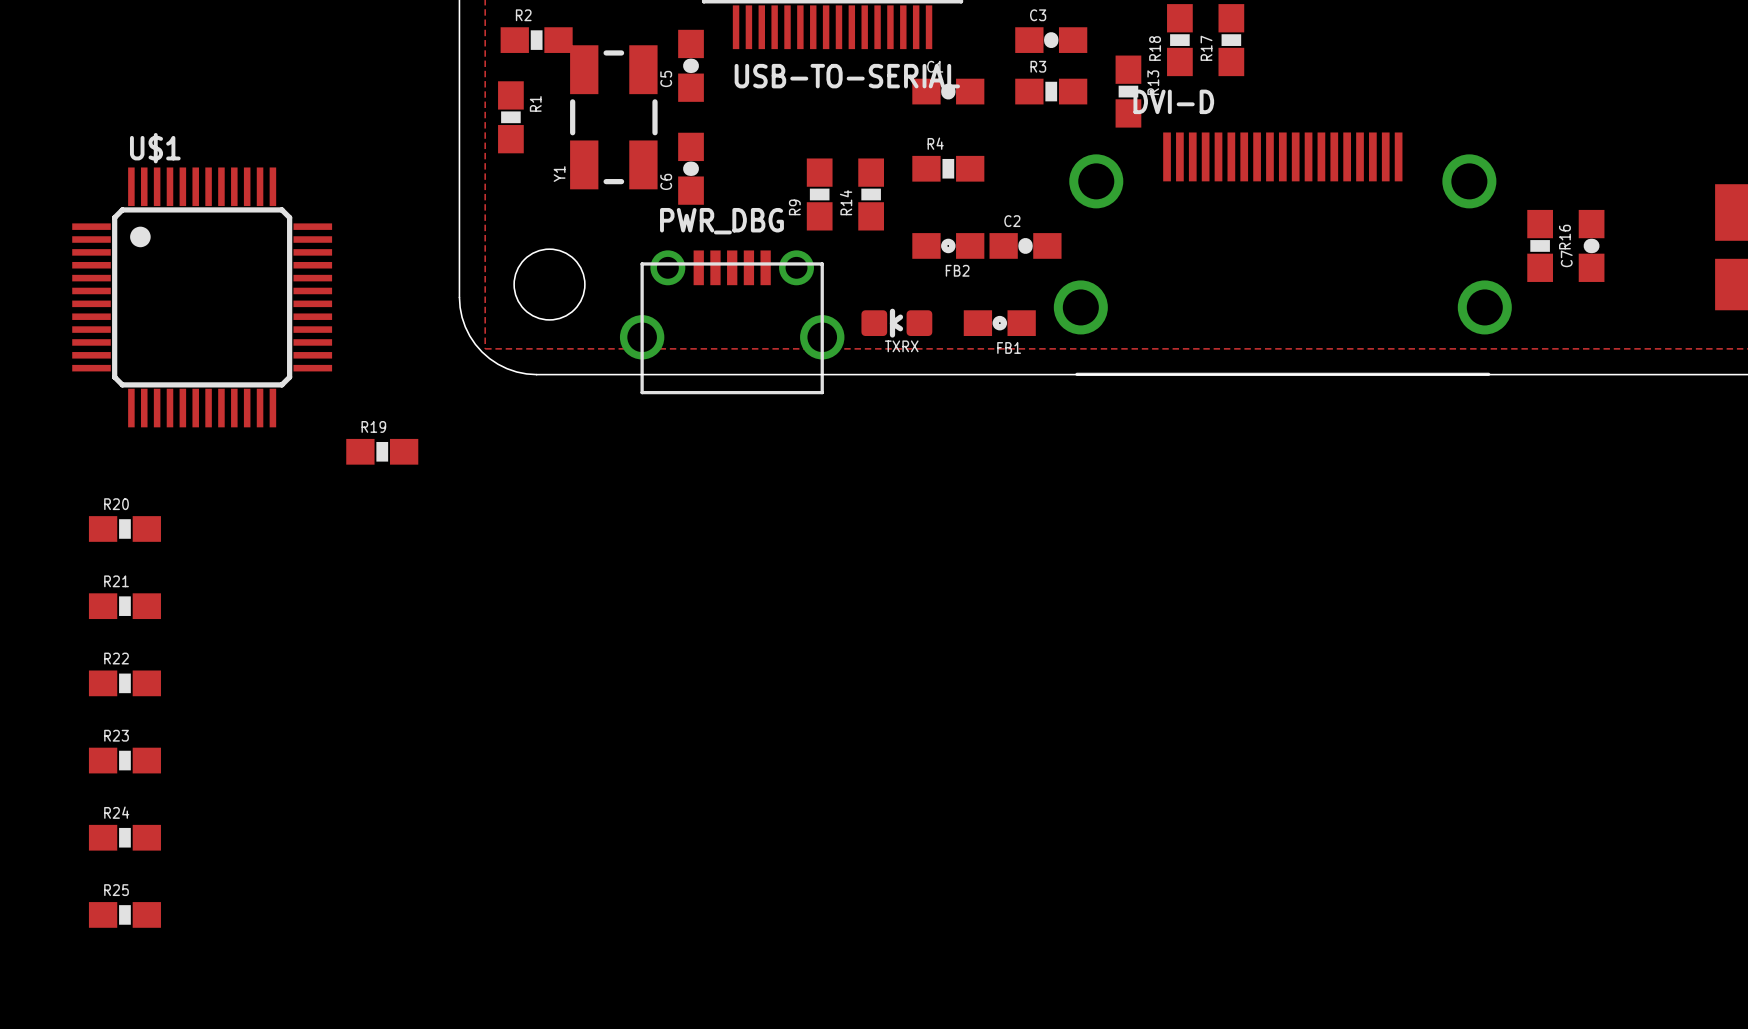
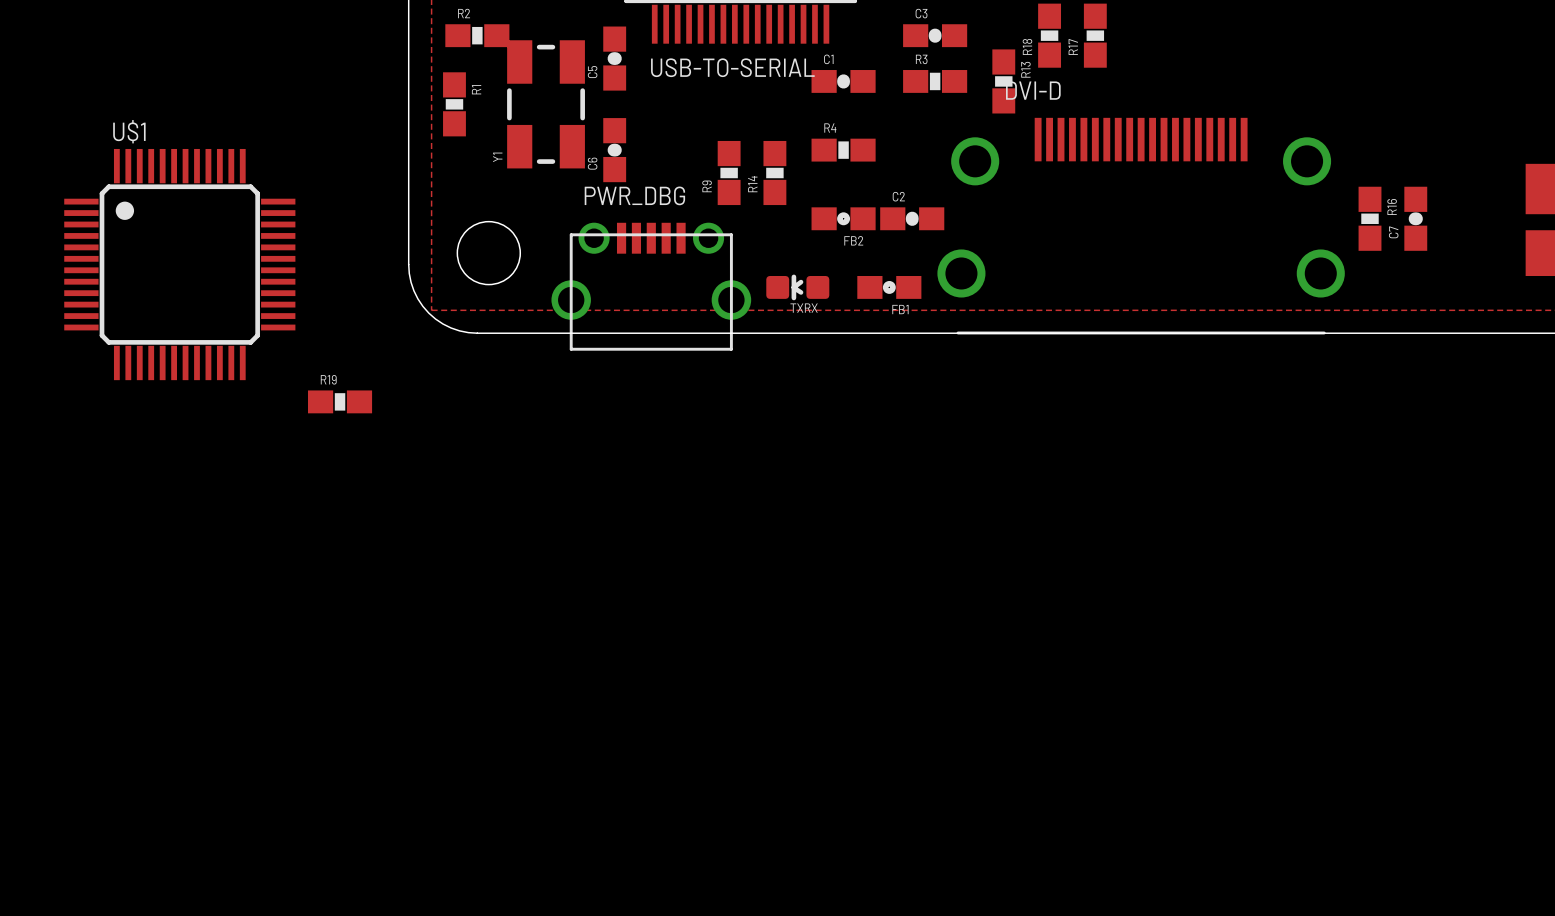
R20: (124, 528) -> none
R21: (124, 606) -> none
R22: (124, 683) -> none
R23: (124, 760) -> none
R24: (124, 837) -> none
R25: (124, 914) -> none

